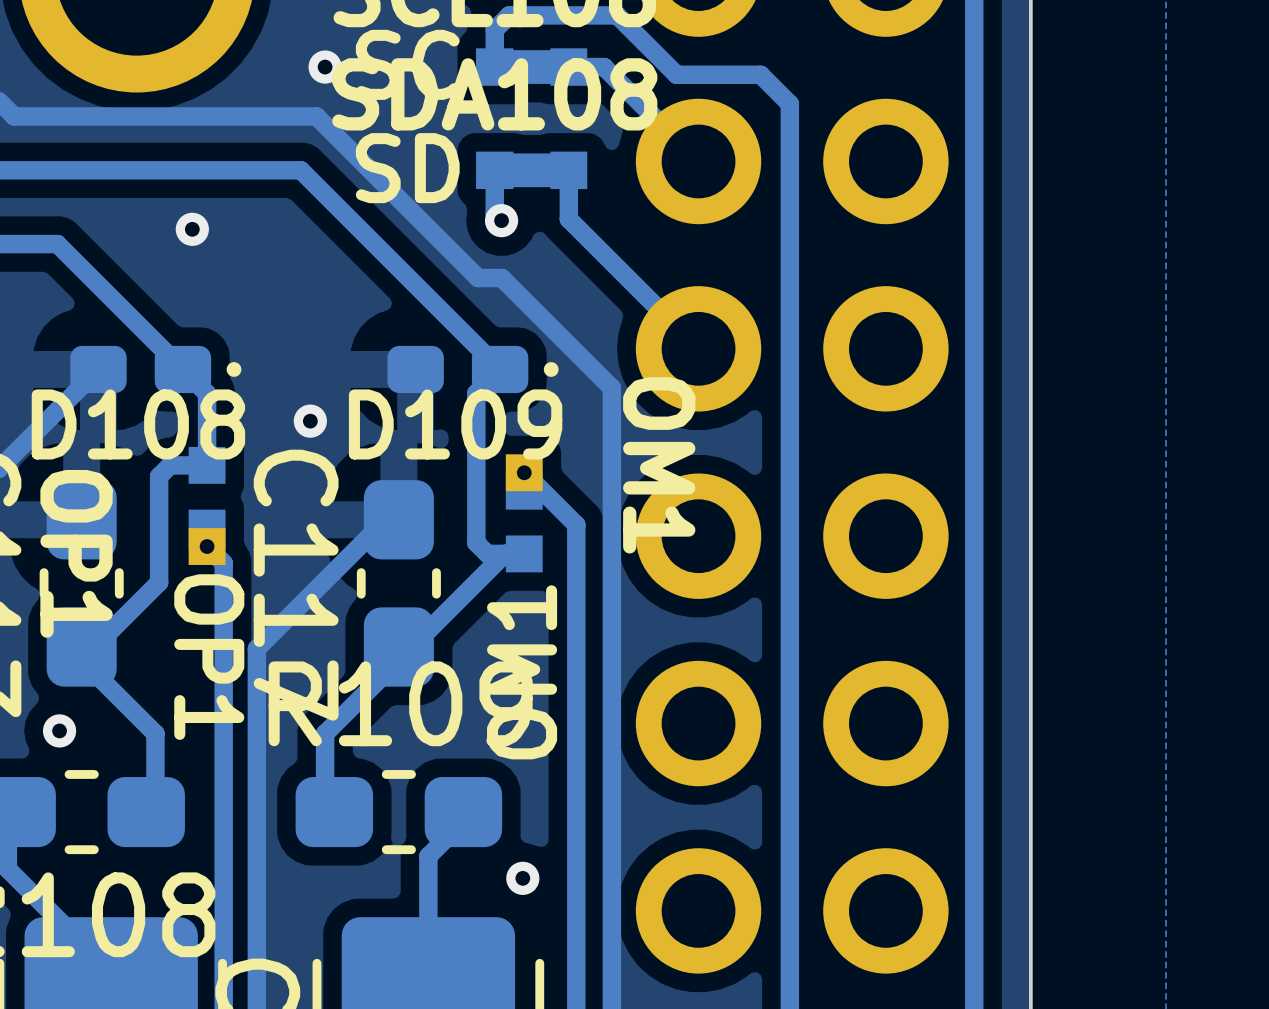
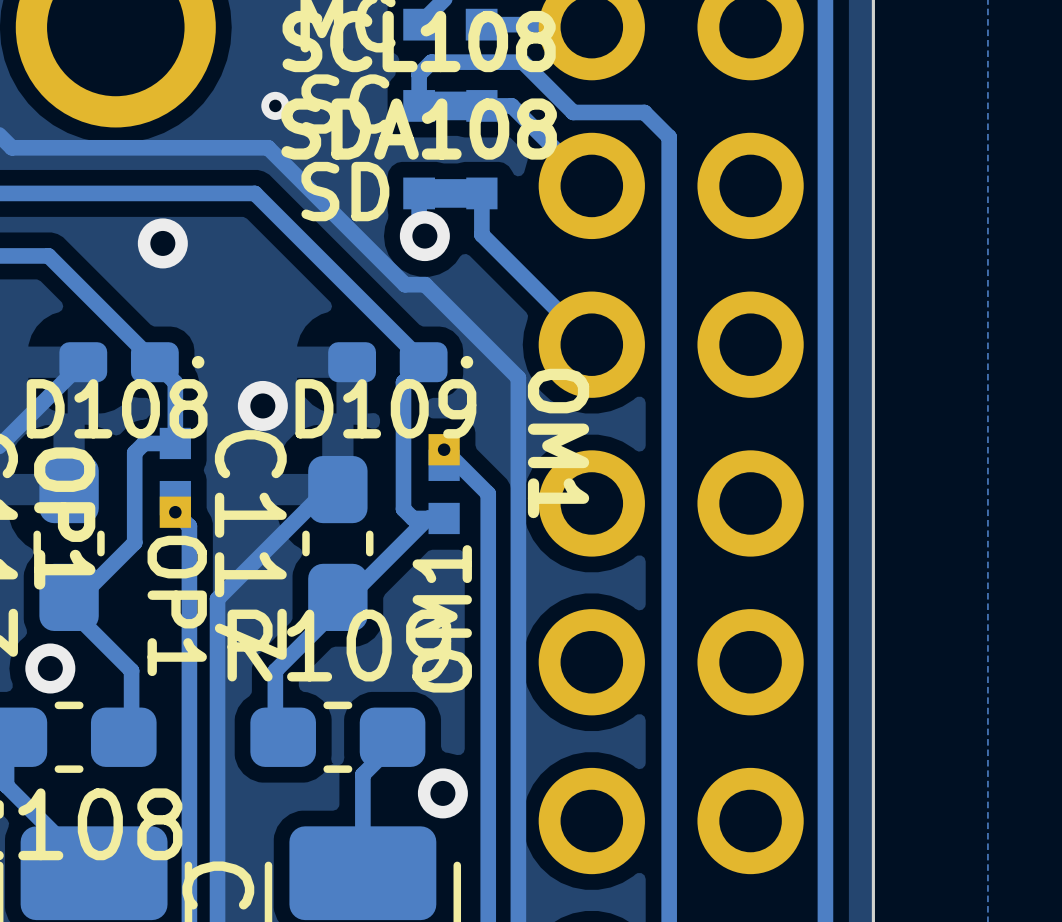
via size: [484, 204, 519, 238] -> [399, 211, 450, 262]
via size: [175, 212, 209, 246] -> [137, 218, 188, 269]
via size: [293, 404, 327, 438] -> [237, 380, 288, 431]
via size: [42, 714, 77, 748] -> [25, 643, 76, 694]
via size: [506, 861, 540, 895] -> [417, 768, 468, 819]

